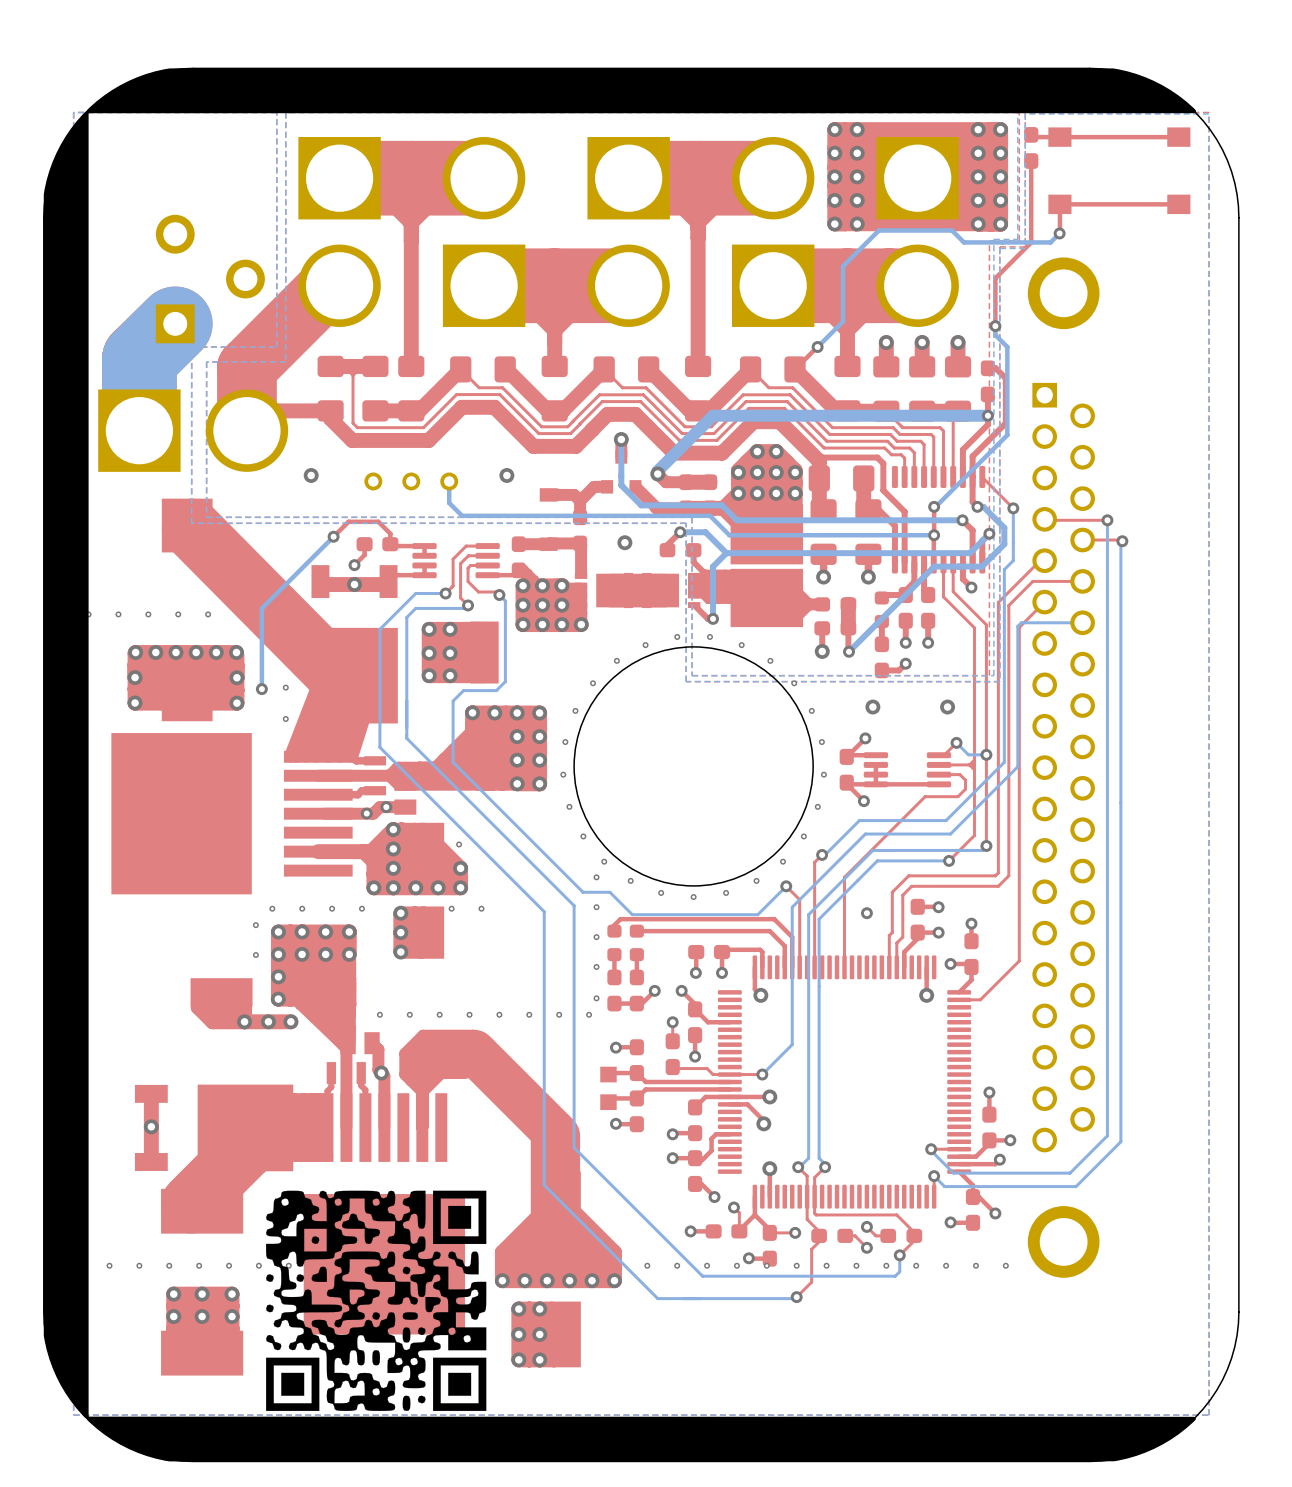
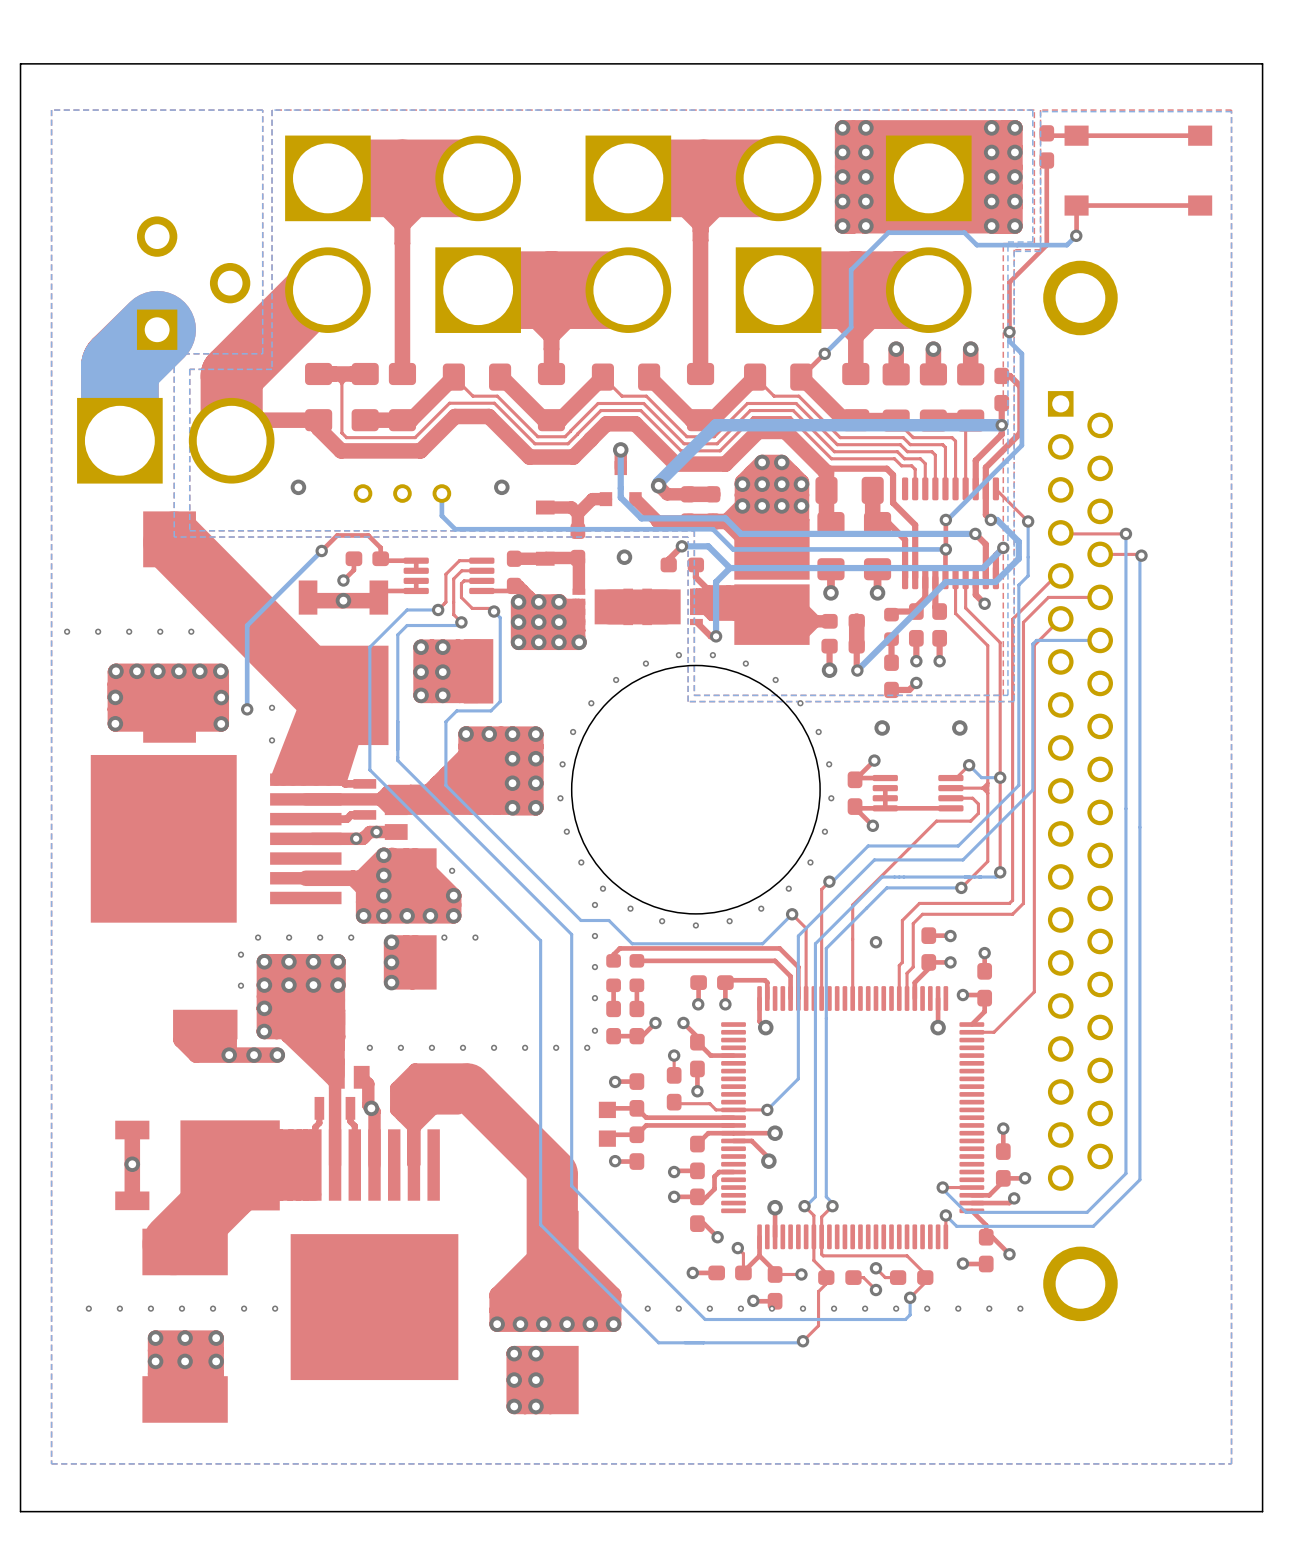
drawing: [43, 68, 1197, 1462] -> none
board edge: (1238, 217) (1237, 194) (1227, 160) (1210, 129) (1195, 112) (1167, 90) (1146, 79) (1124, 72) (1089, 68) (193, 68) (169, 70) (147, 75) (125, 84) (105, 96) (79, 120) (65, 139) (55, 160) (45, 194) (43, 217) -> (1262, 219) (1262, 63) (20, 63) (20, 219)
board edge: (1238, 1312) (1237, 1335) (1227, 1369) (1210, 1399) (1195, 1417) (1177, 1432) (1146, 1450) (1112, 1459) (1089, 1461) (193, 1461) (169, 1459) (147, 1454) (125, 1445) (105, 1432) (79, 1409) (65, 1390) (55, 1369) (45, 1335) (43, 1312) -> (1262, 1356) (1262, 1511) (20, 1511) (20, 1356)

